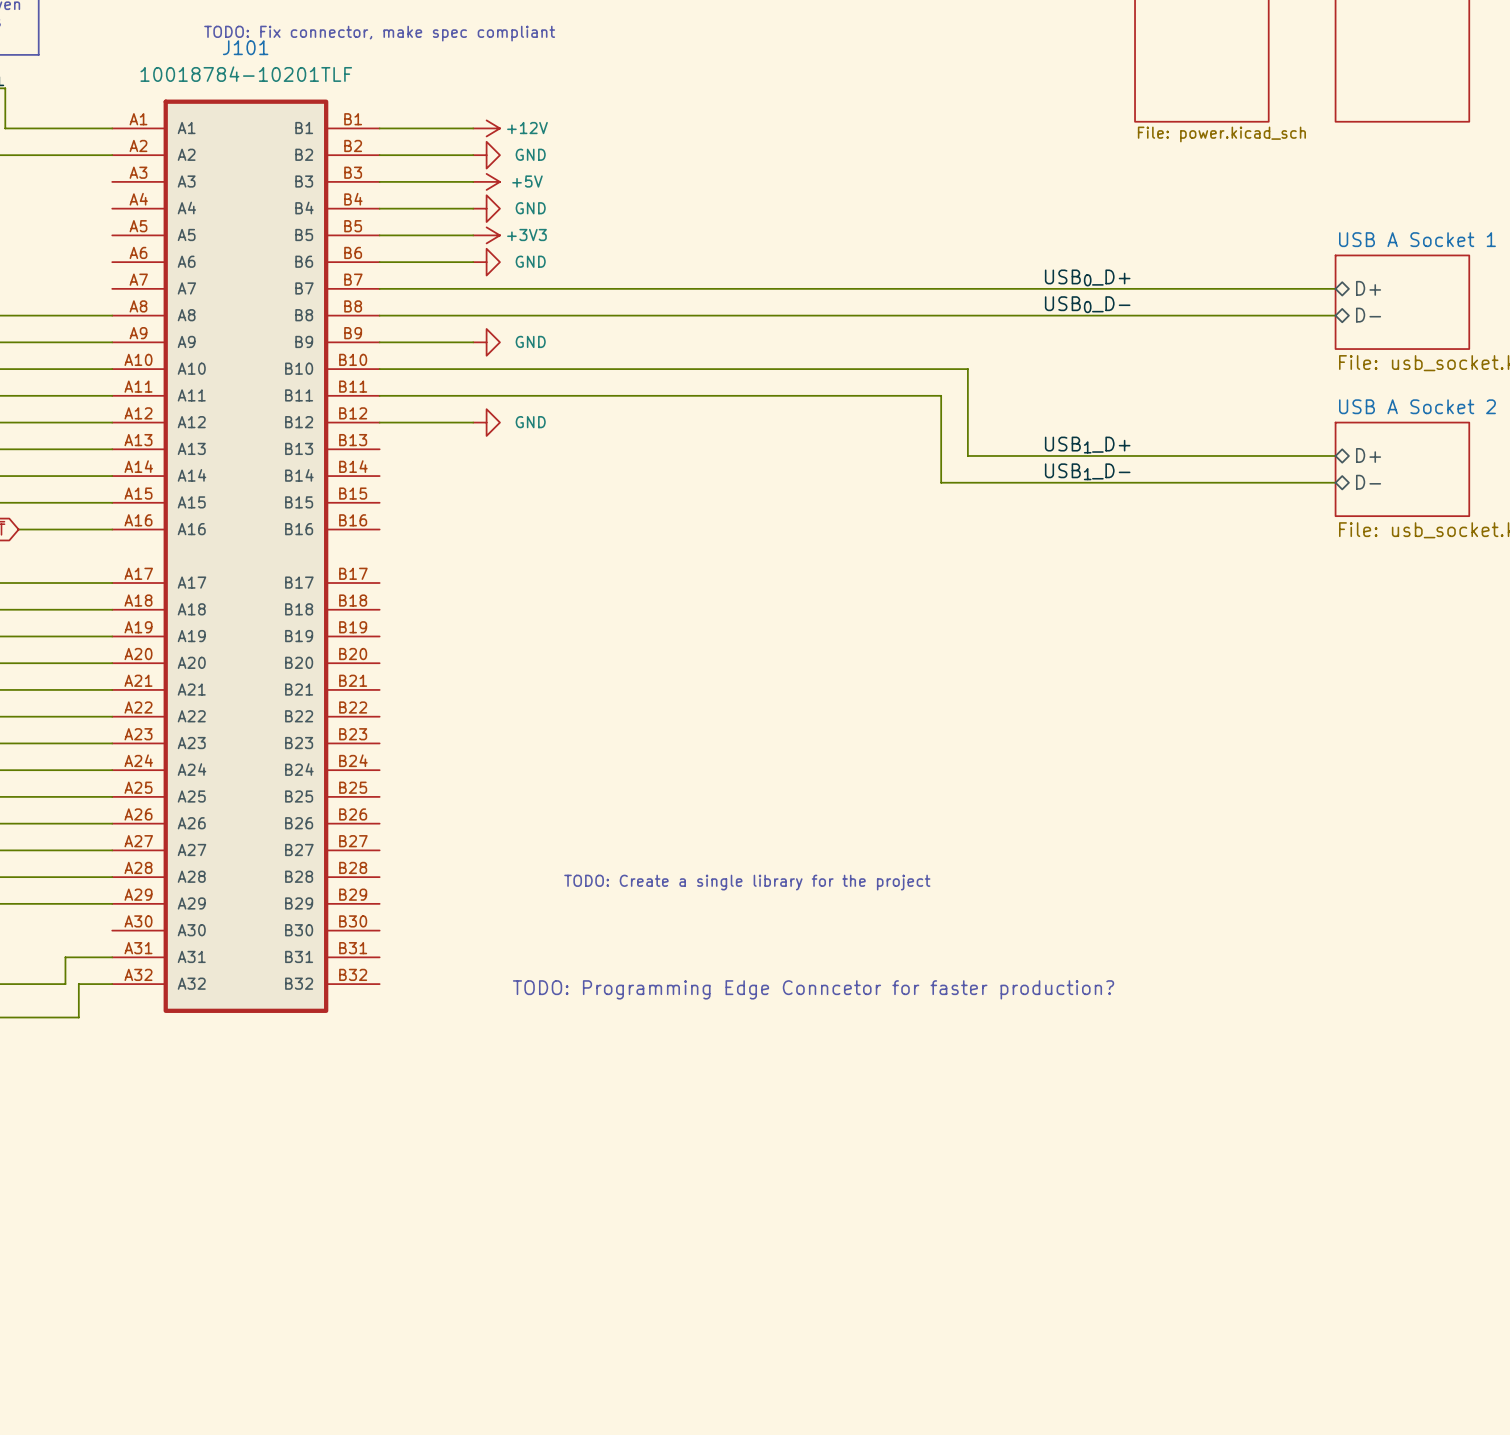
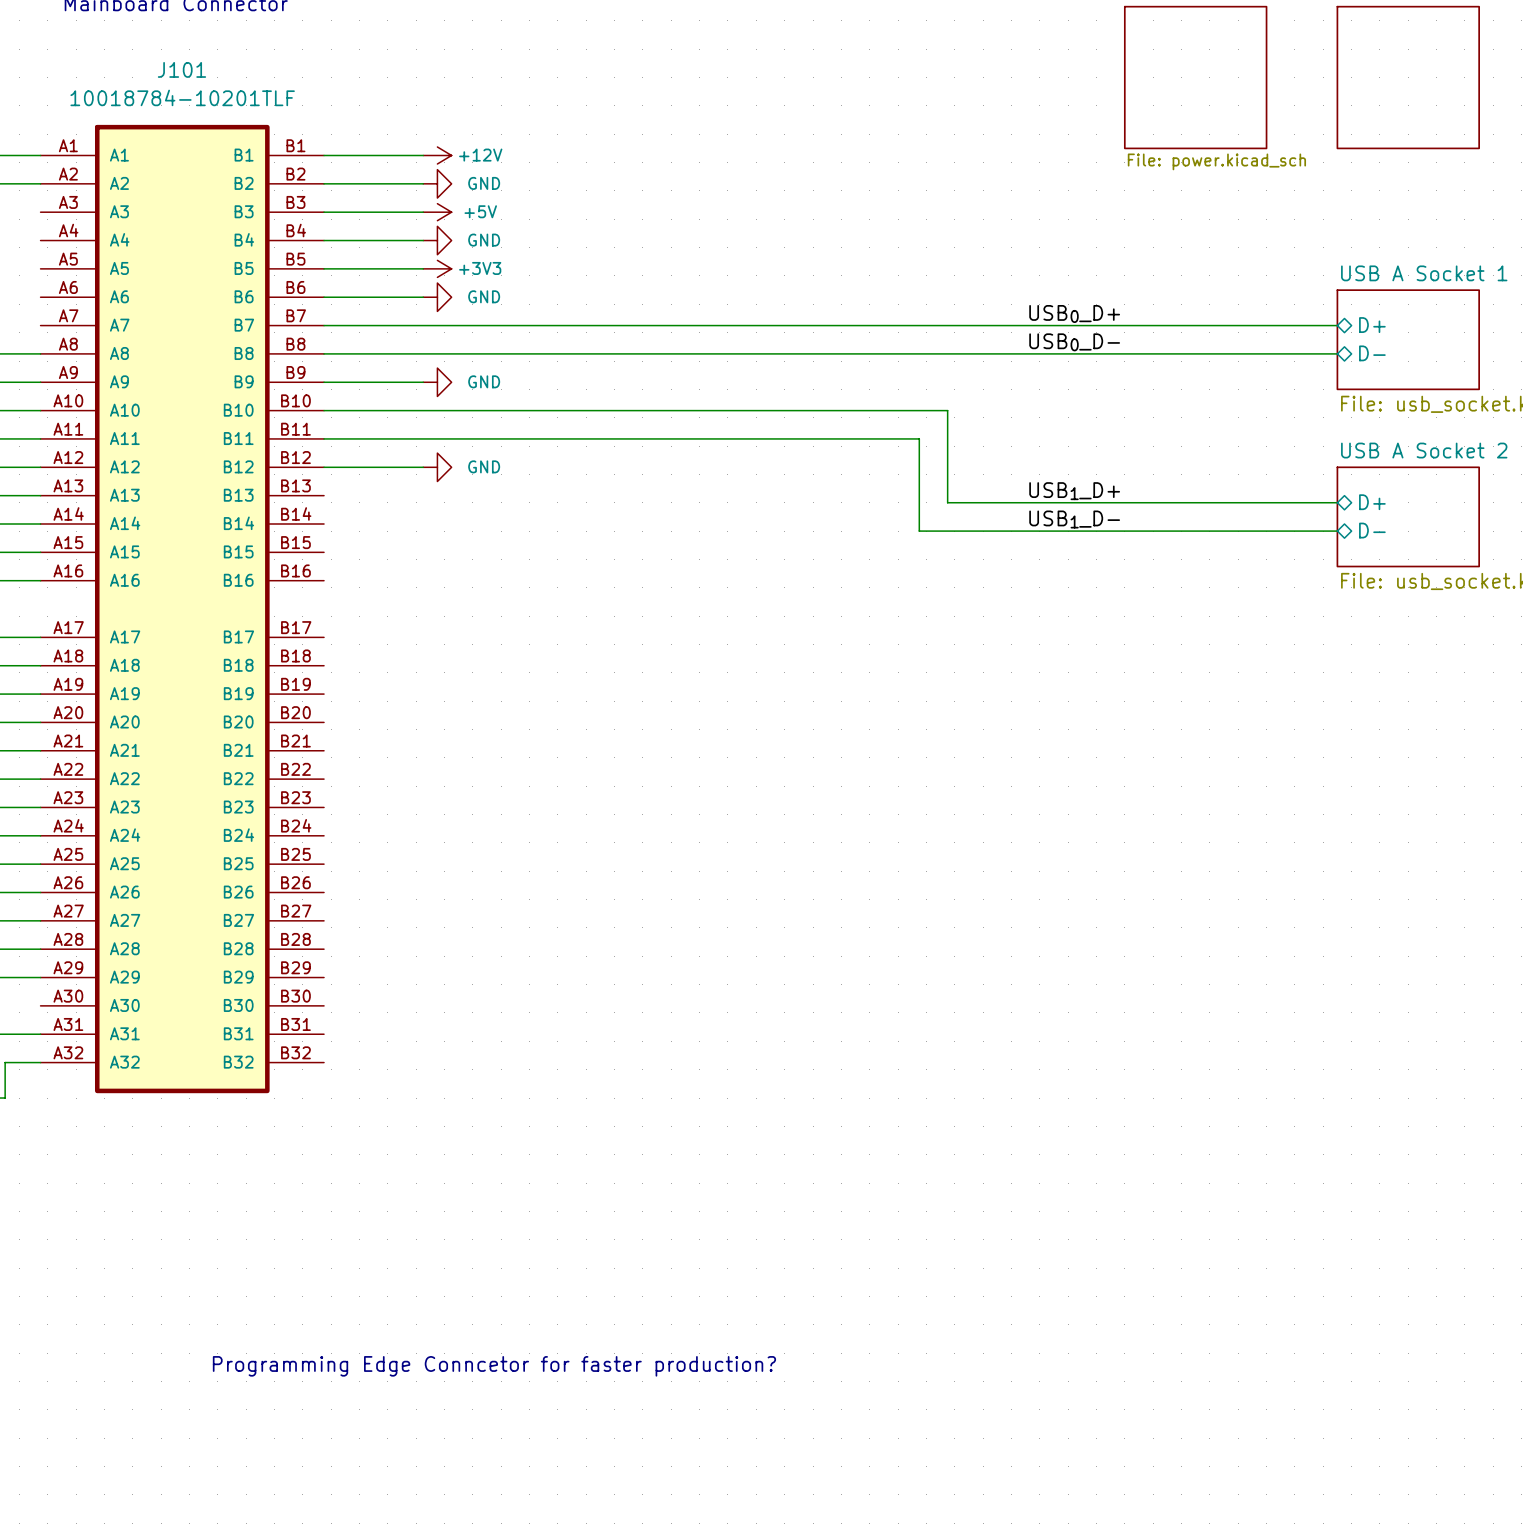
text: TODO: Fix connector, make spec compliant (379, 33) -> none
text: TODO: Create a single library for the project (747, 882) -> none
text: TODO: Programming Edge Conncetor for faster production? (813, 989) -> none
text: none -> Programming Edge Conncetor for faster production? (494, 1366)

